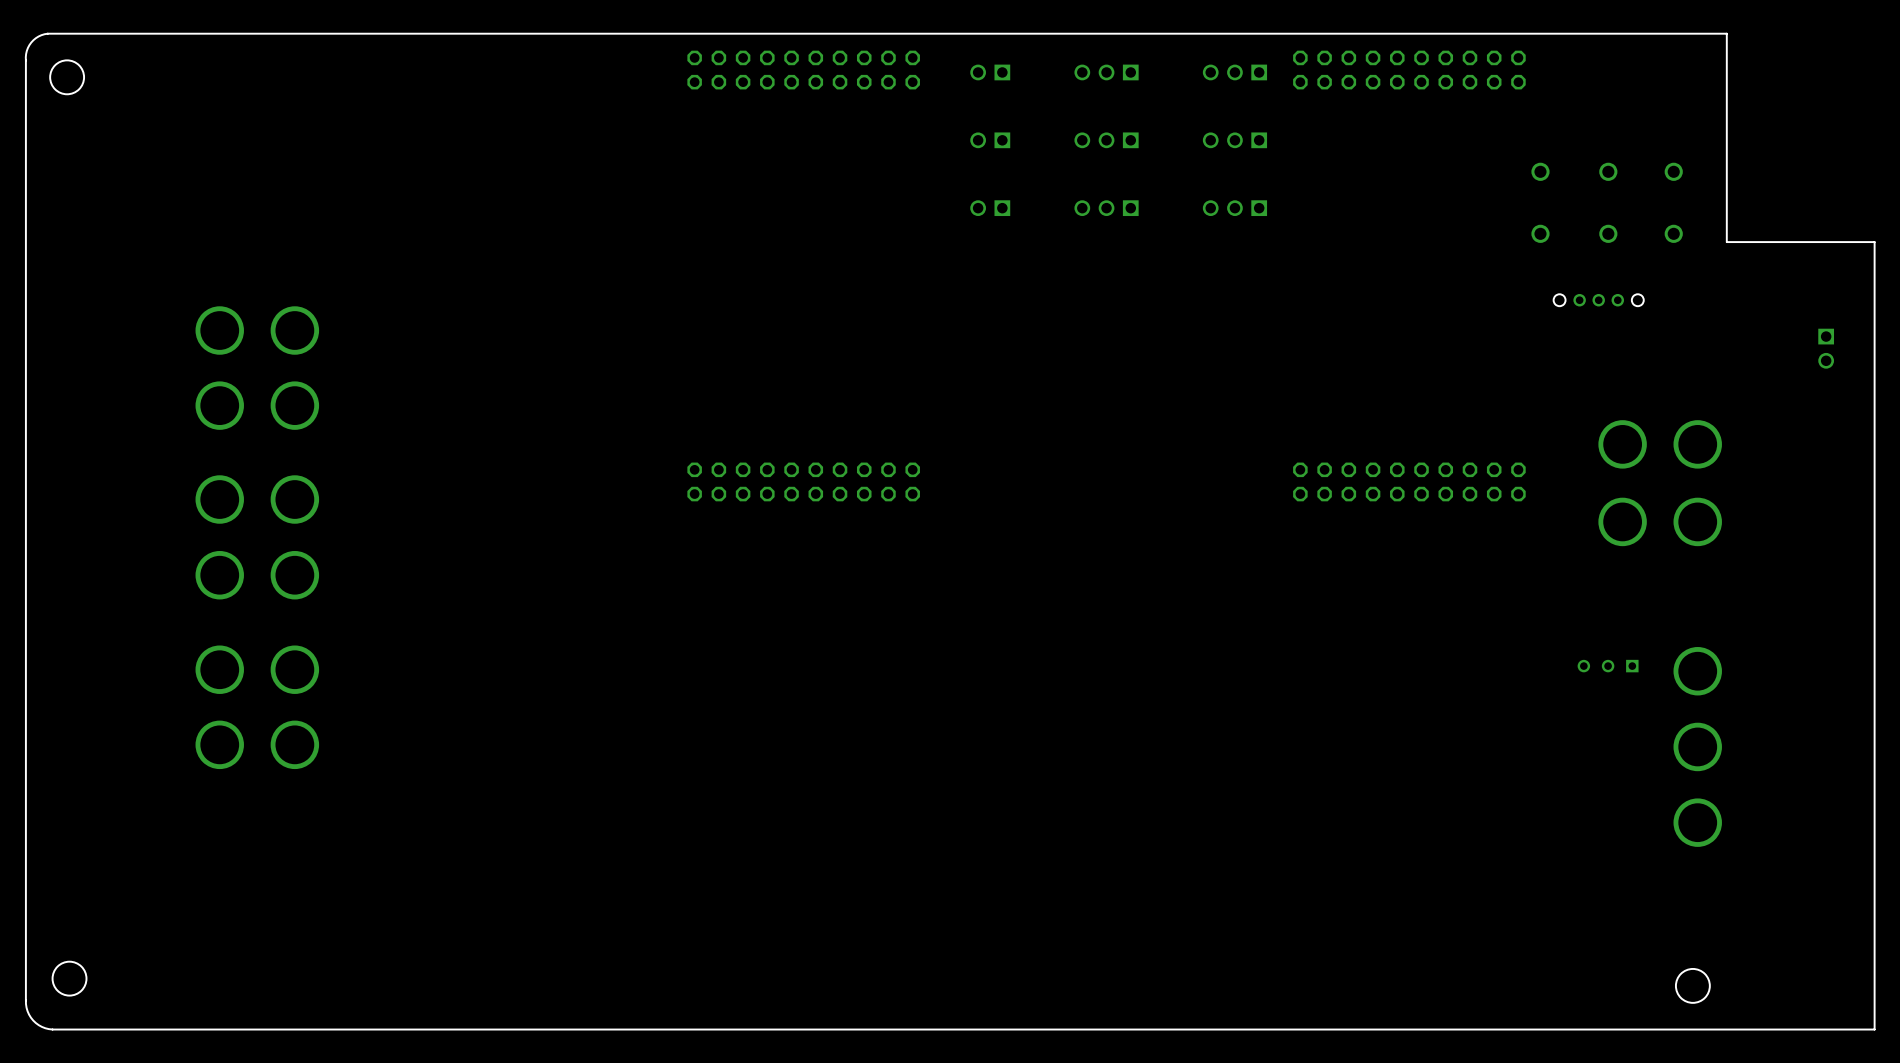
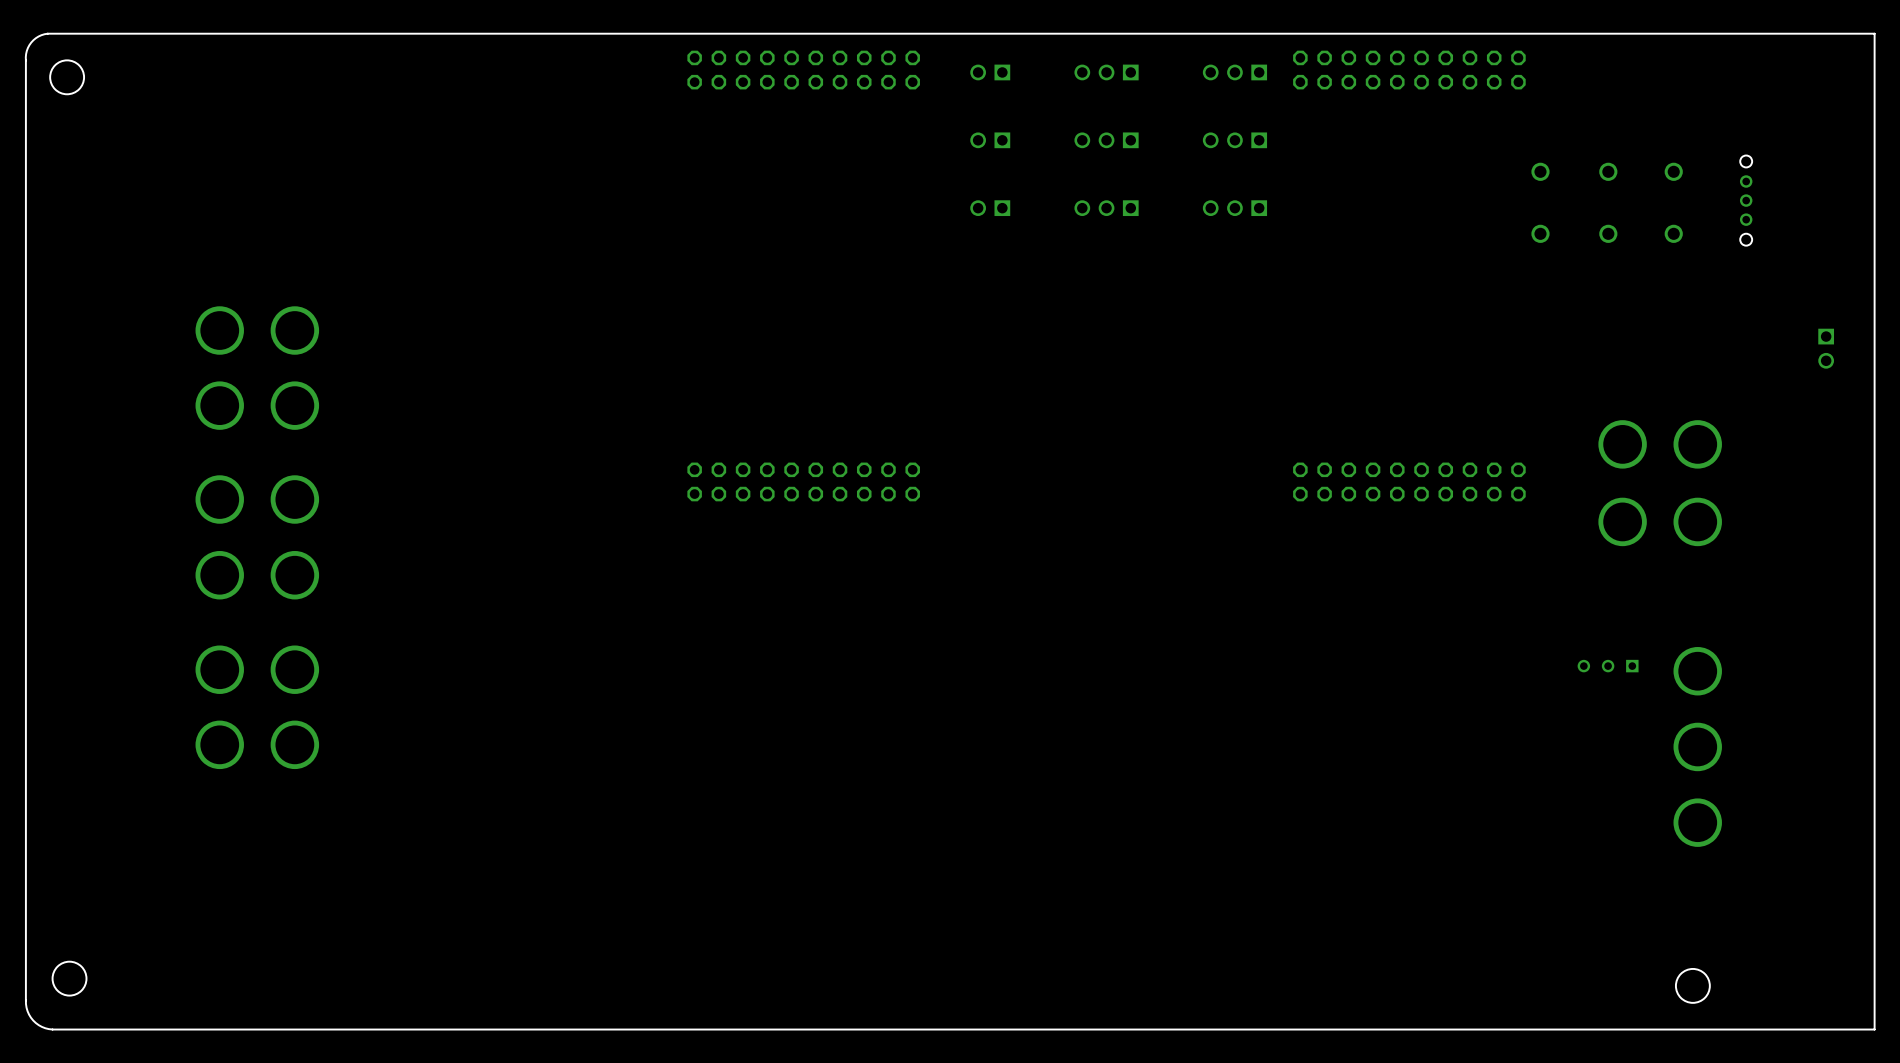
board edge: (1726, 33) (1726, 242) (1874, 242) -> (1726, 33) (1874, 33) (1874, 242)
part rotation: 0° (1598, 300) -> 90° clockwise (1746, 200)
part position: (1598, 300) -> (1746, 200)

